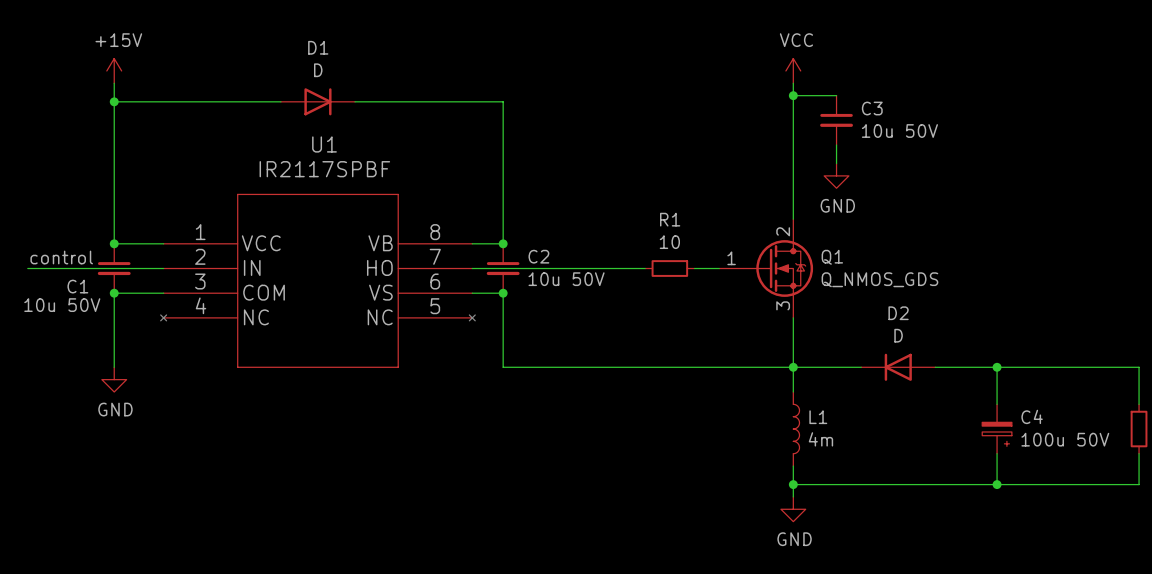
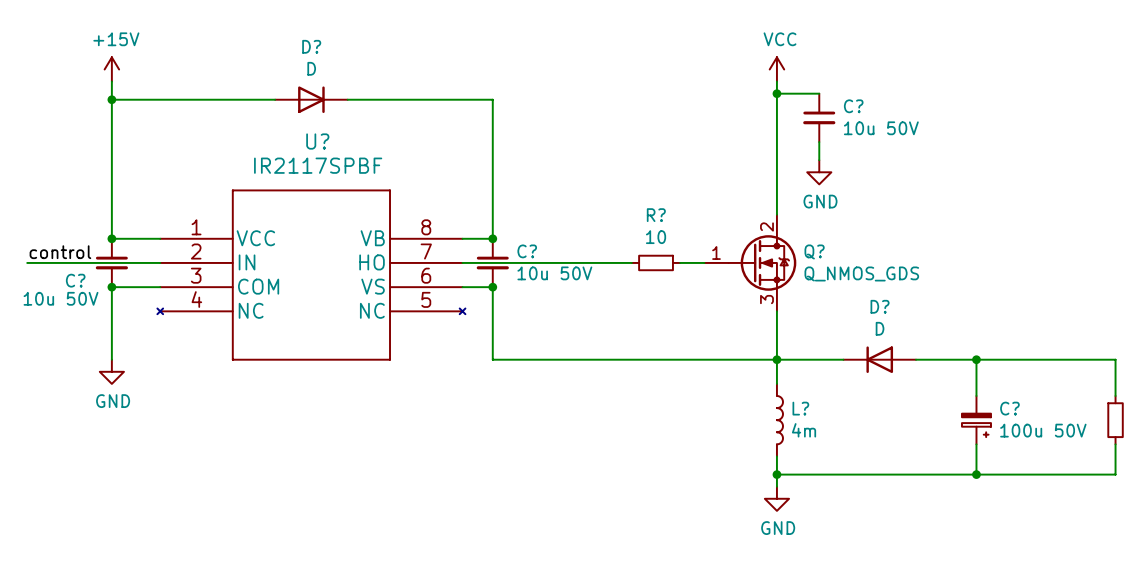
D1 name: D1 (318, 47) -> D? (311, 46)
C3 name: C3 (872, 108) -> C? (853, 106)
U1 name: U1 (324, 144) -> U? (317, 141)
R1 name: R1 (670, 219) -> R? (656, 215)
C2 name: C2 (538, 256) -> C? (527, 251)
Q1 name: Q1 (832, 257) -> Q? (814, 251)
C1 name: C1 (77, 286) -> C? (75, 280)
D2 name: D2 (898, 313) -> D? (880, 306)
C4 name: C4 (1032, 416) -> C? (1009, 408)
L1 name: L1 (818, 417) -> L? (800, 408)

